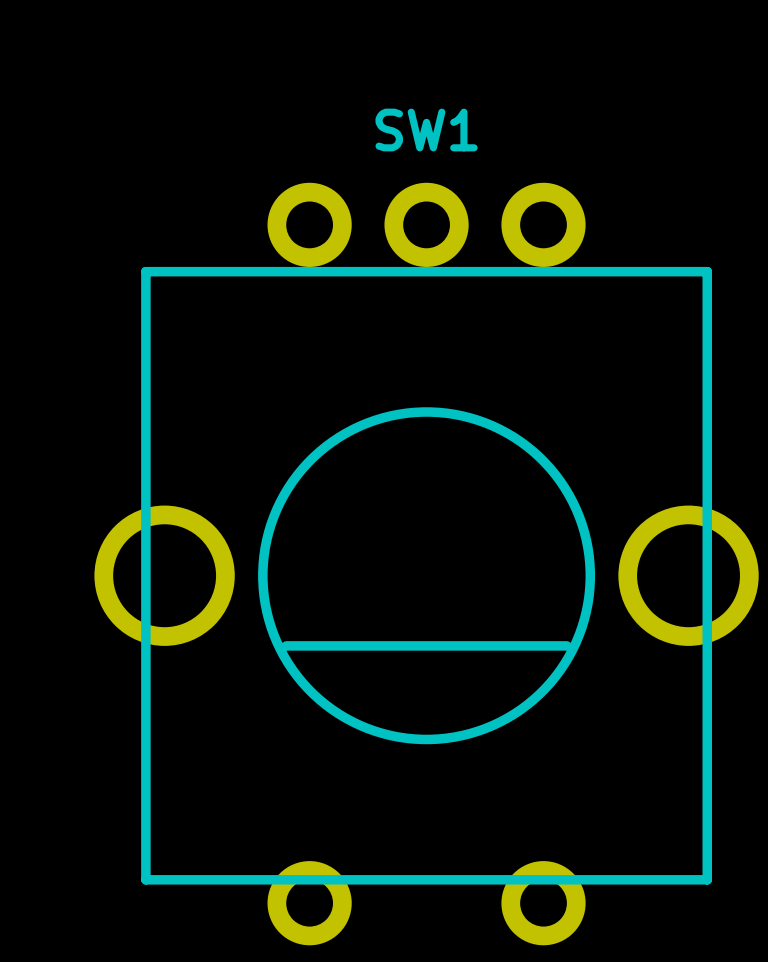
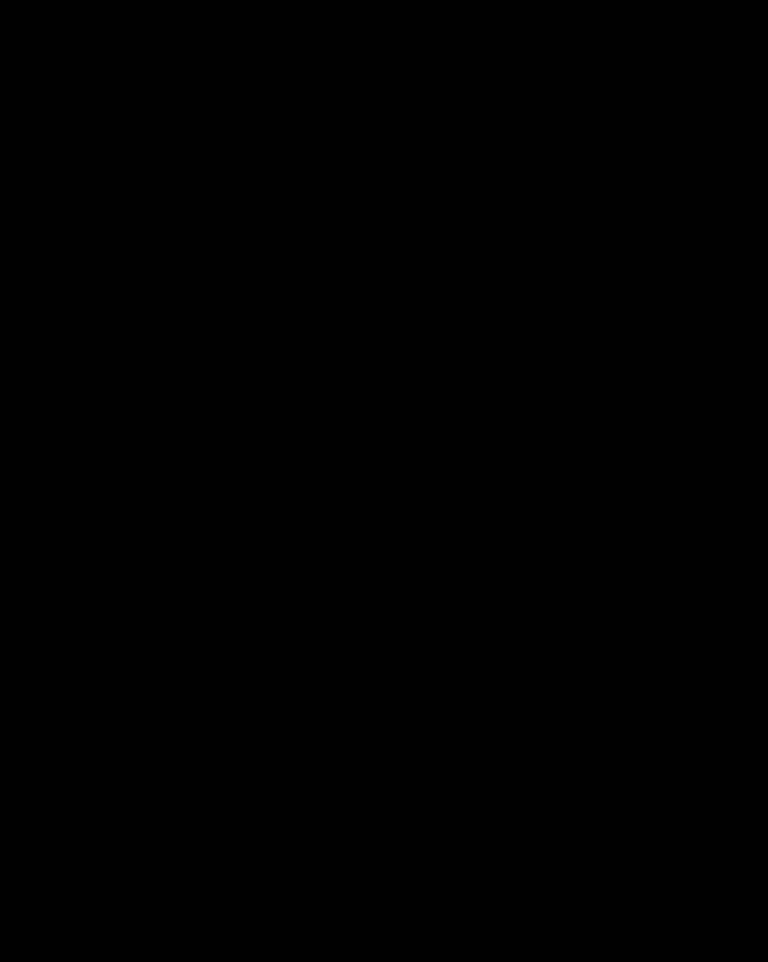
SW1: (426, 564) -> none

